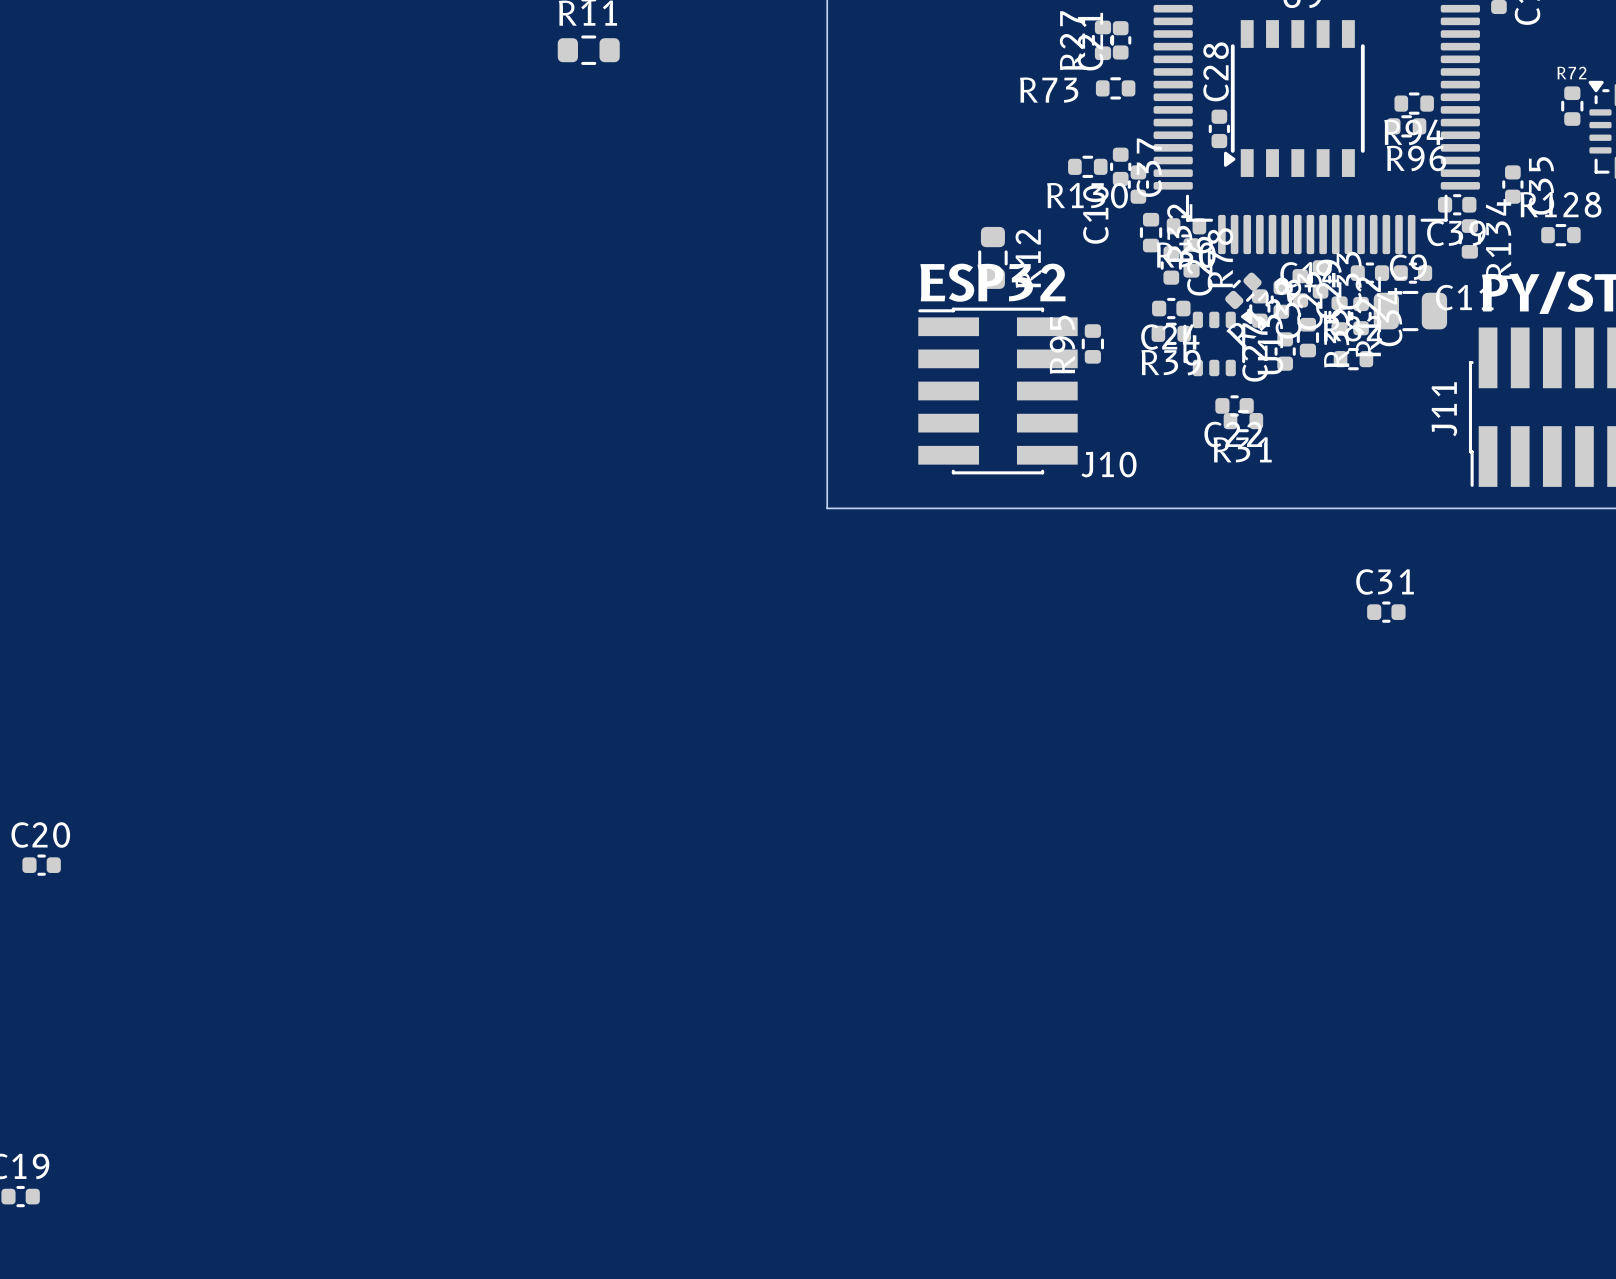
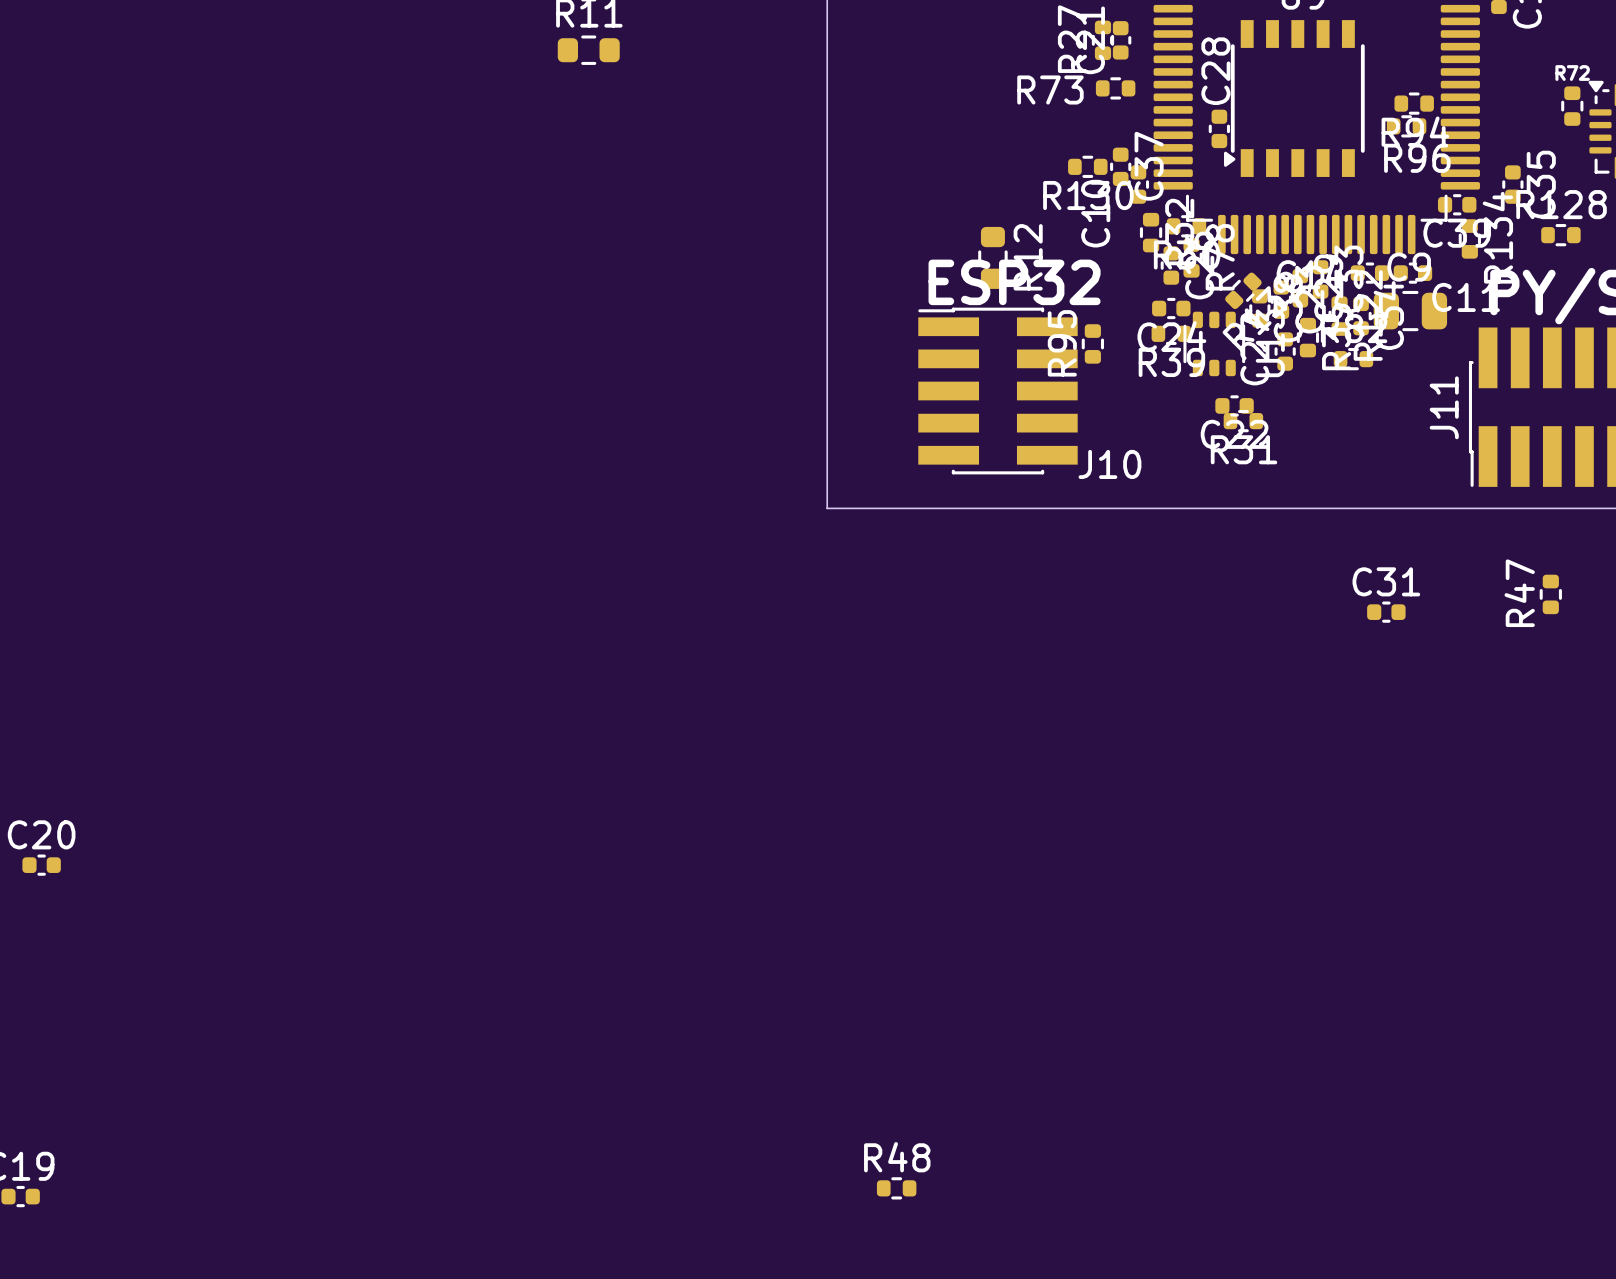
R47: none -> (1550, 594)
R48: none -> (896, 1188)

